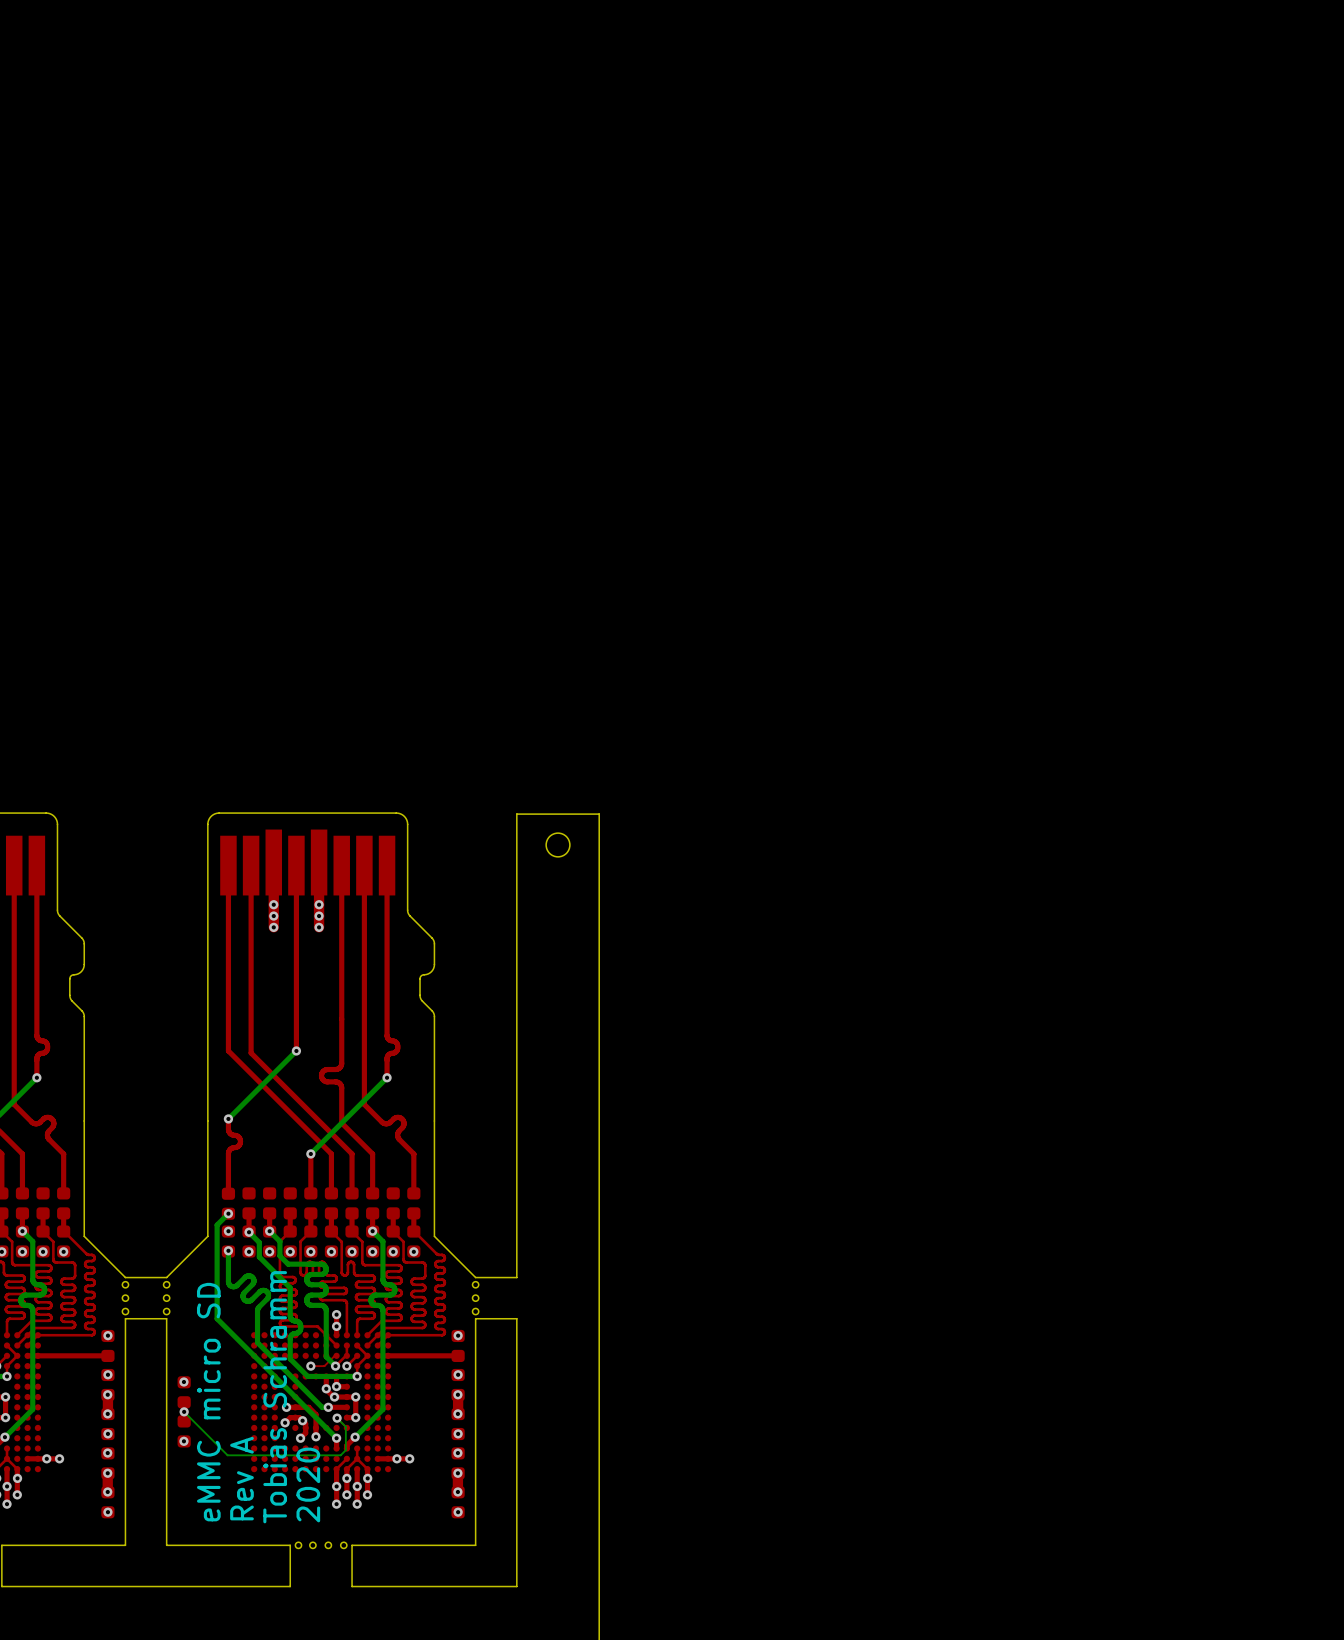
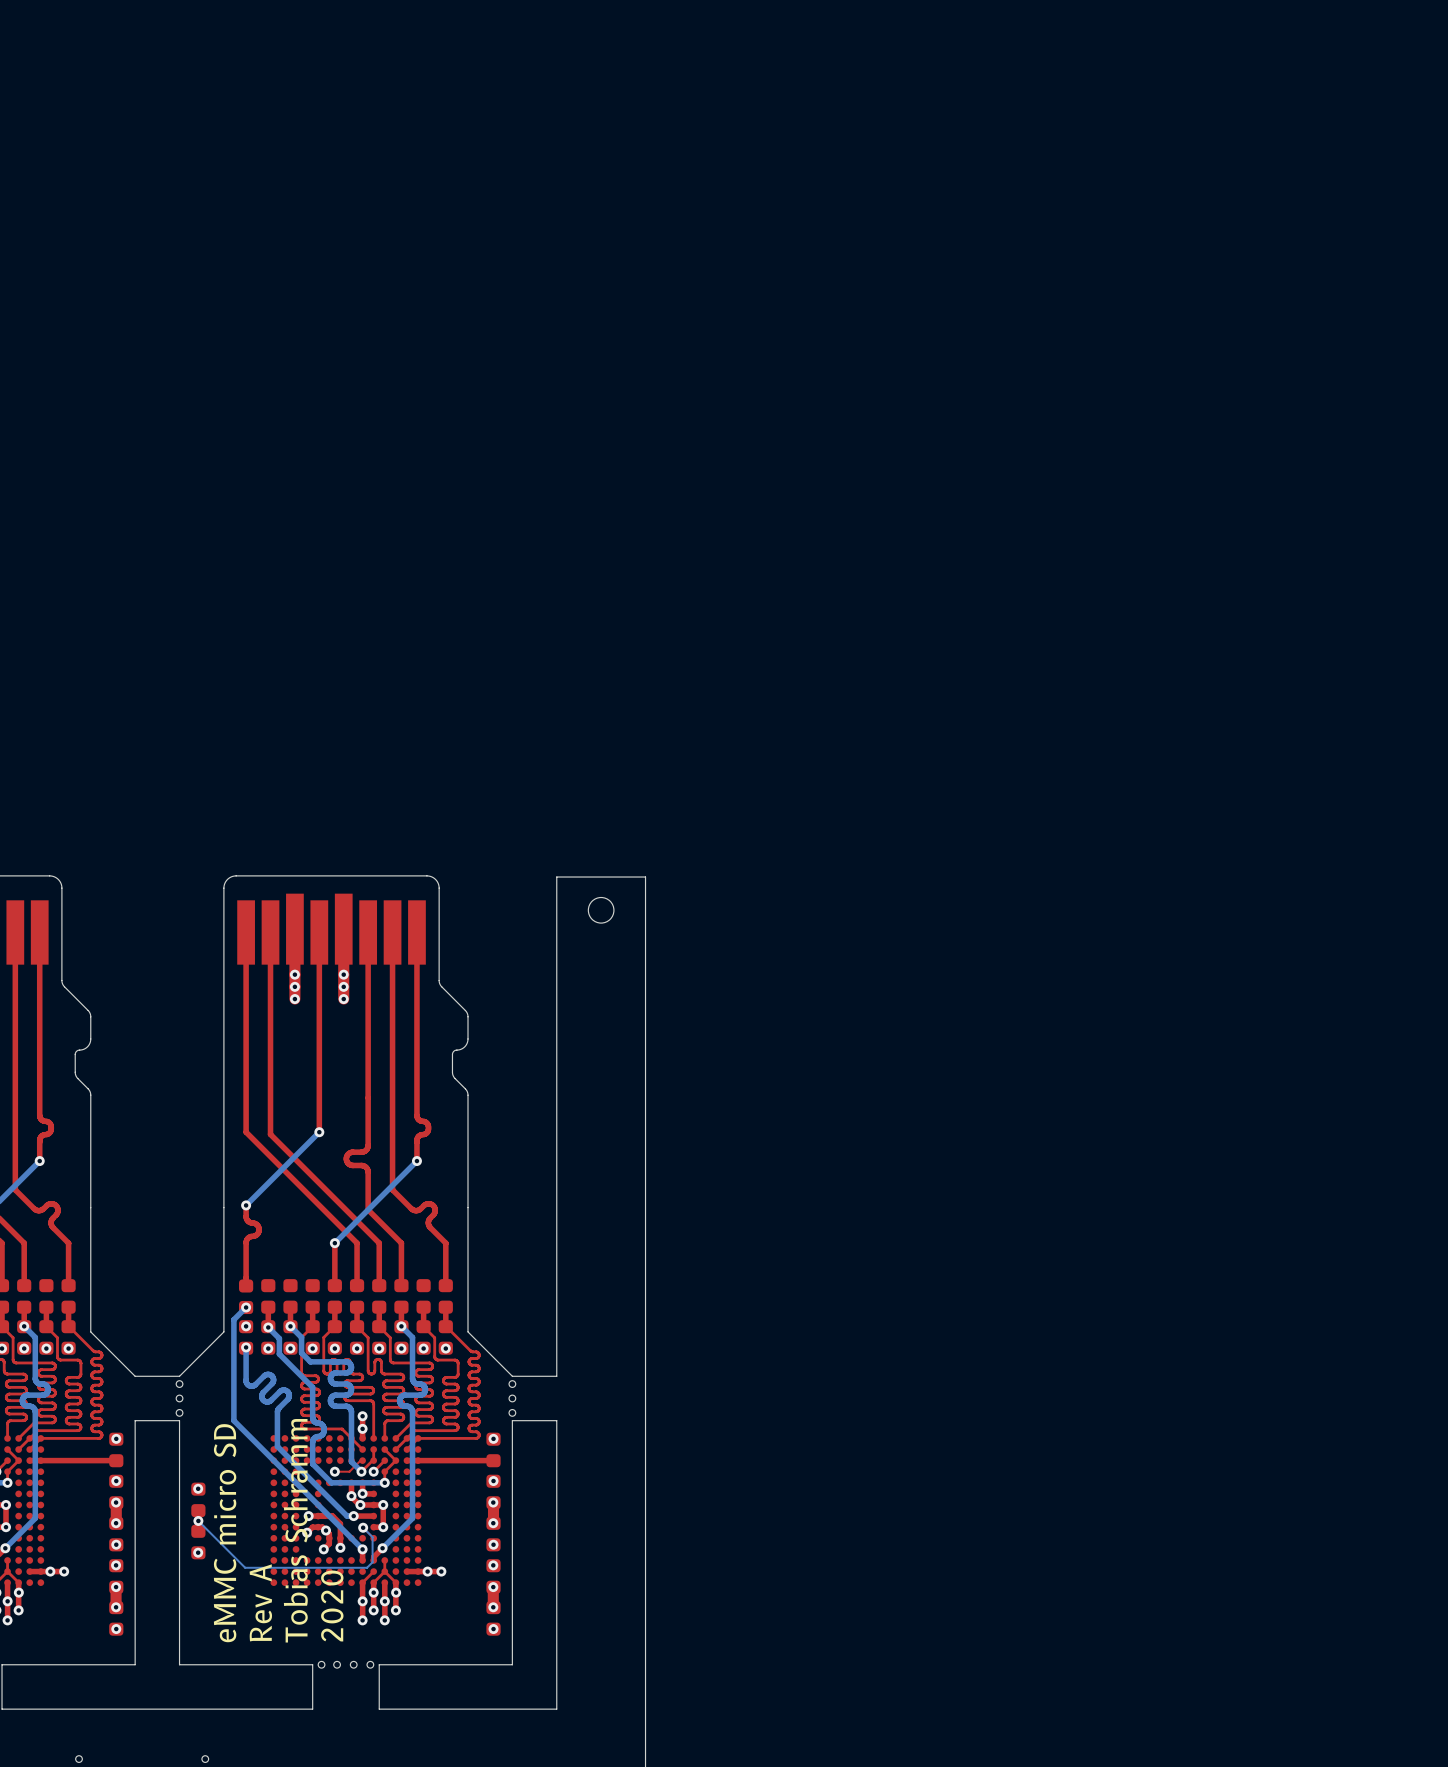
part: (125, 1284) -> none
part: (125, 1298) -> none
part: (125, 1311) -> none
part: none -> (79, 1759)
part: none -> (205, 1759)

